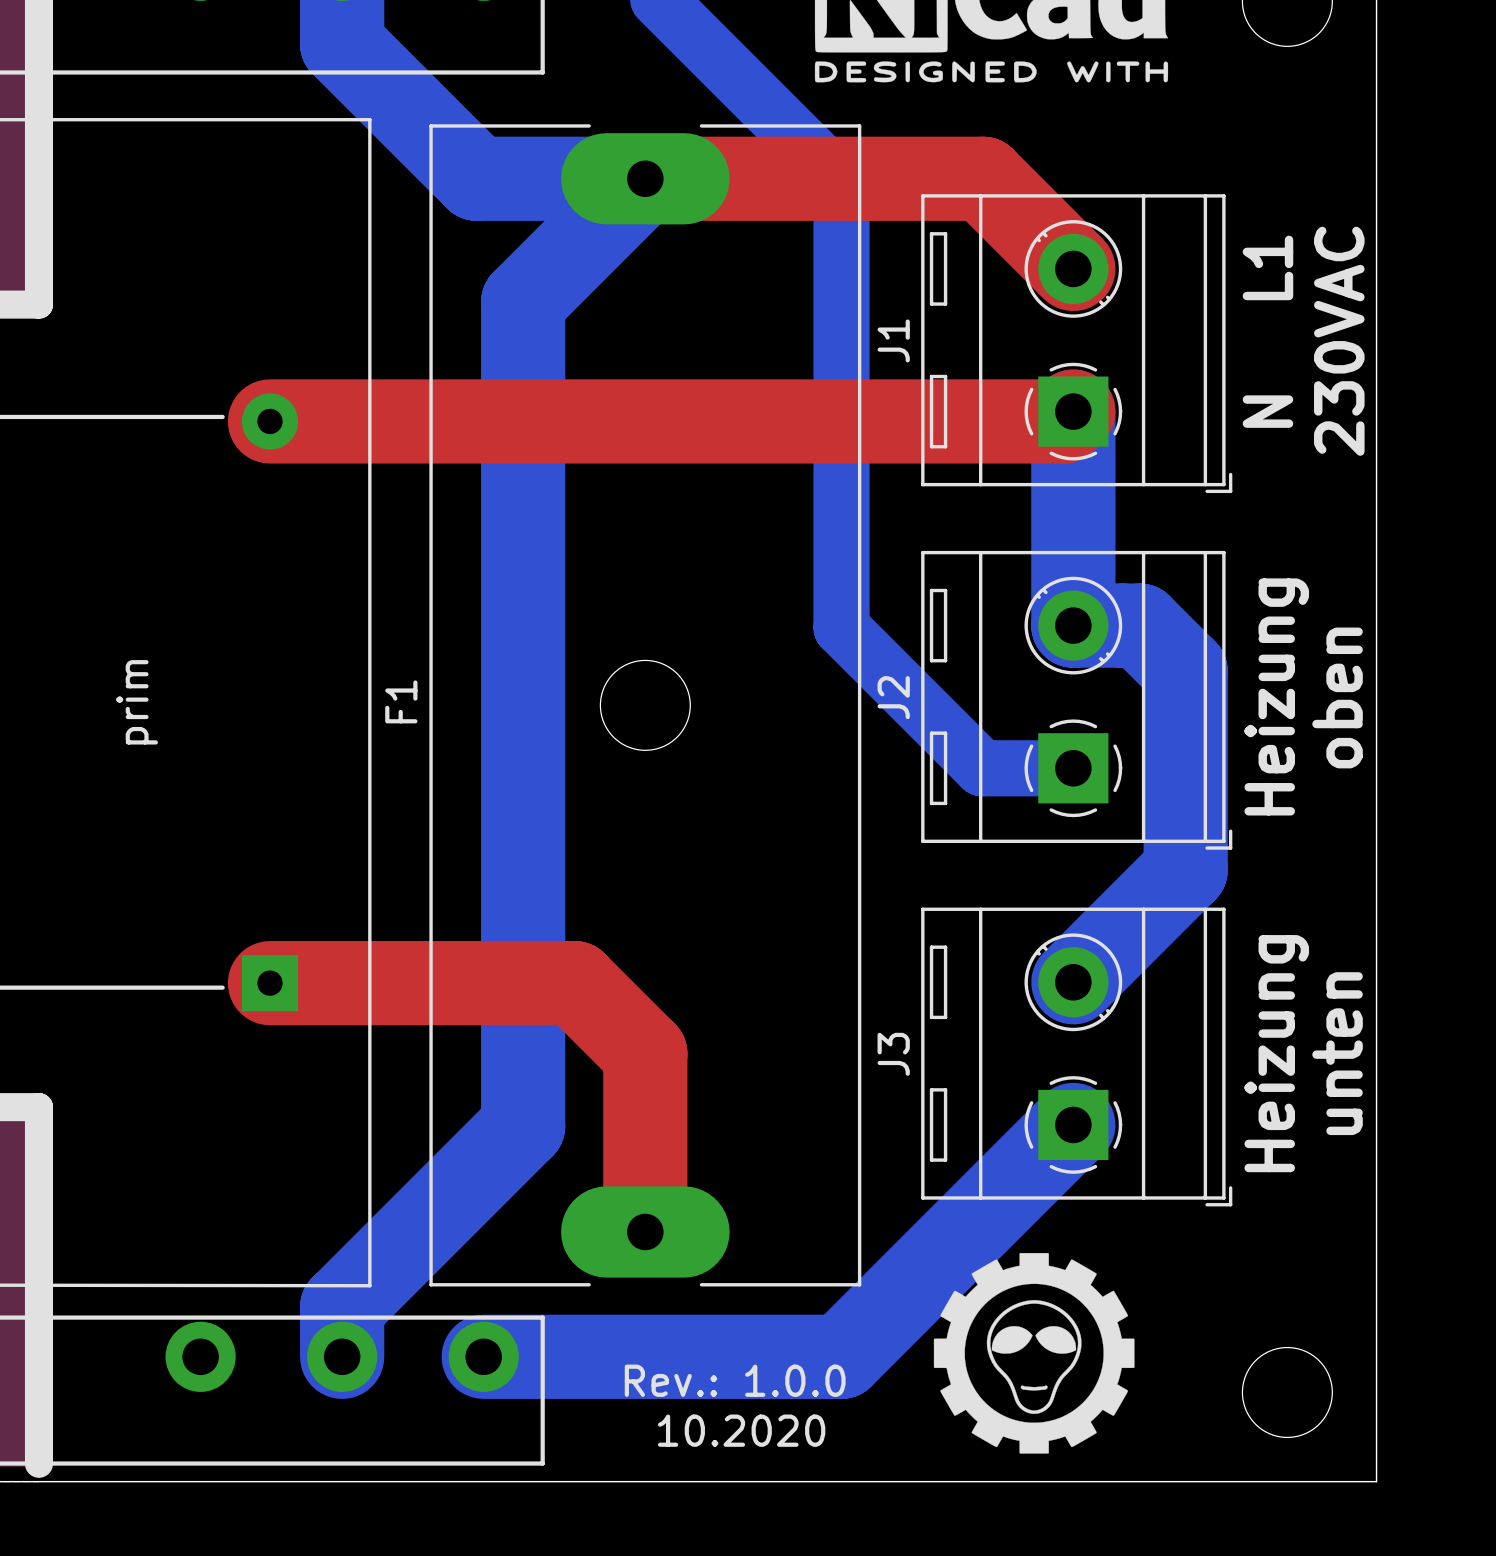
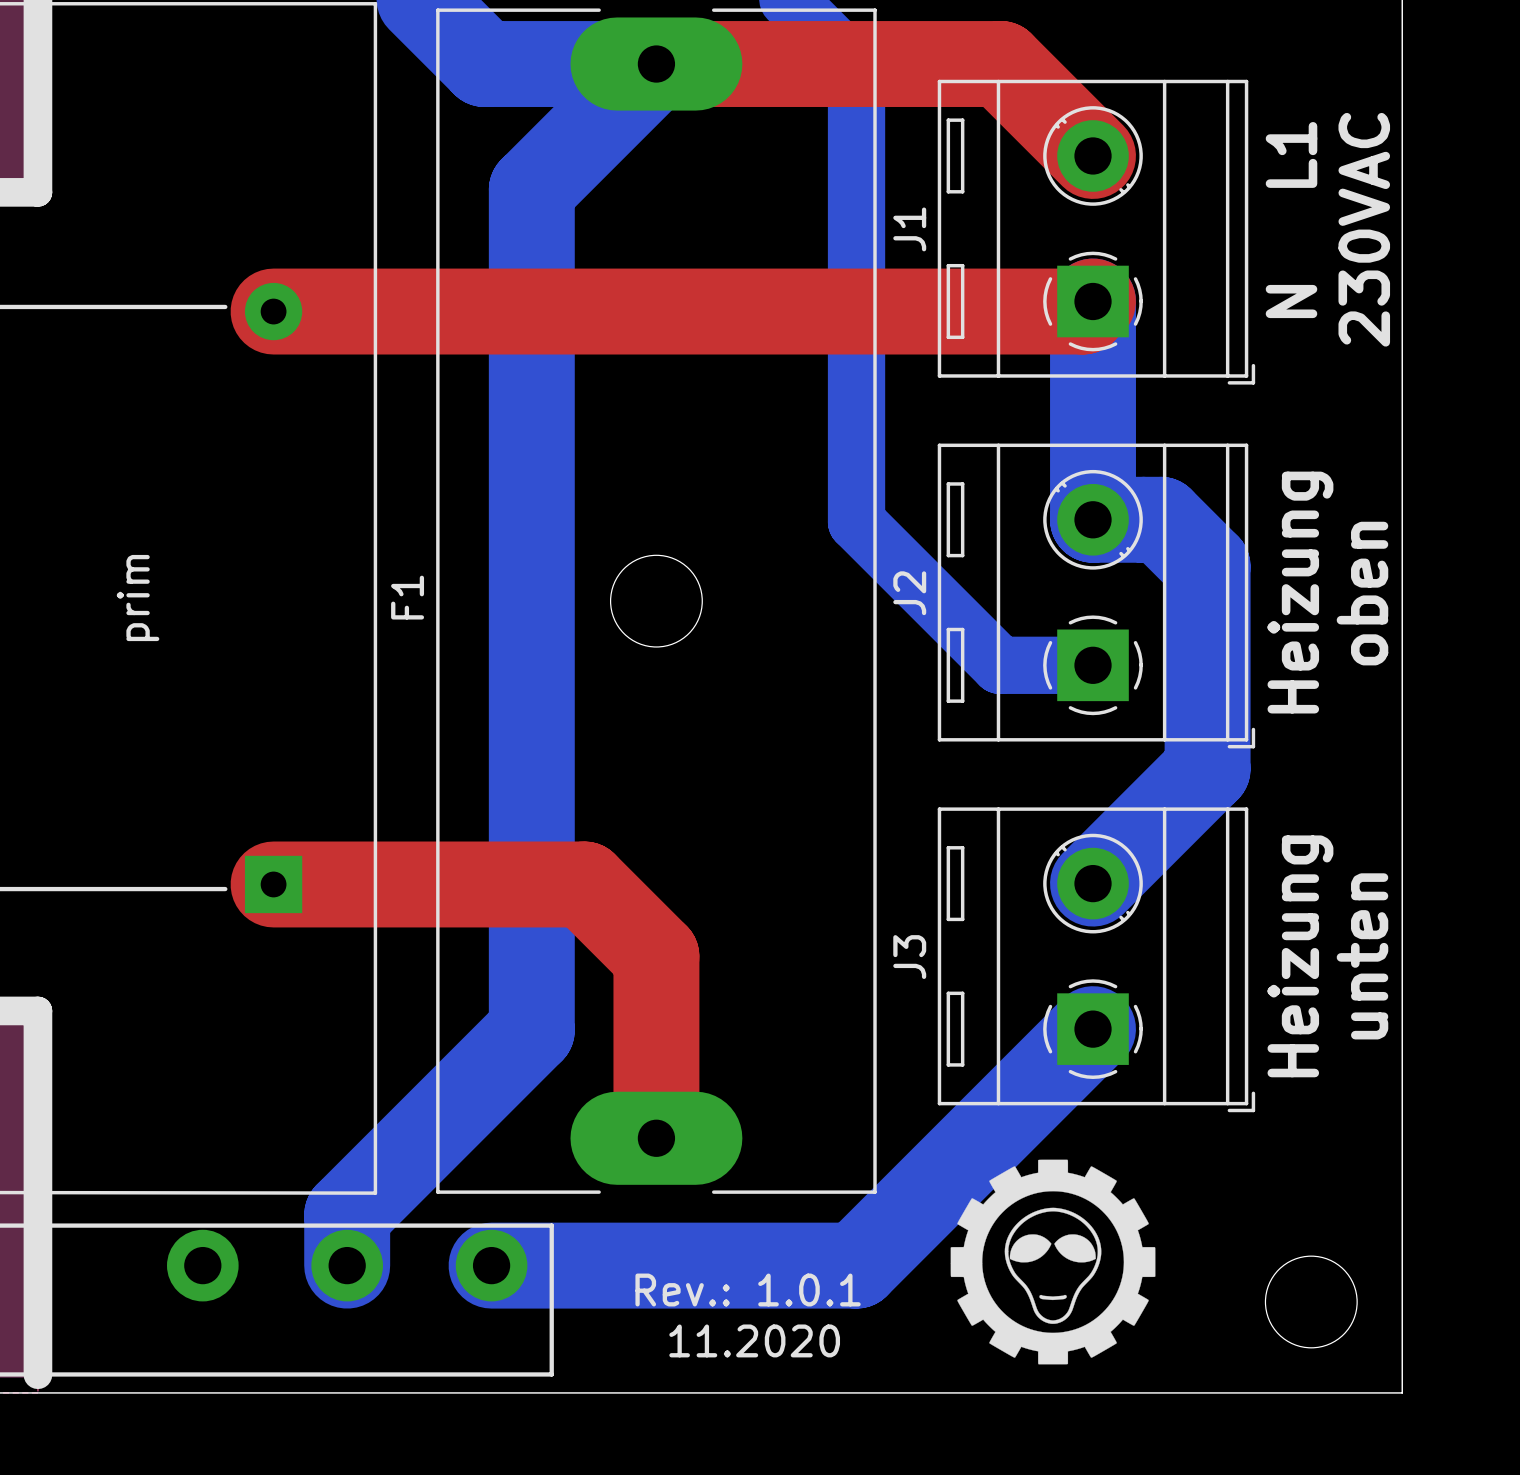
text: Rev.: 1.0.0 (735, 1380) -> Rev.: 1.0.1 (748, 1290)
text: 10.2020 (741, 1430) -> 11.2020 (754, 1340)

